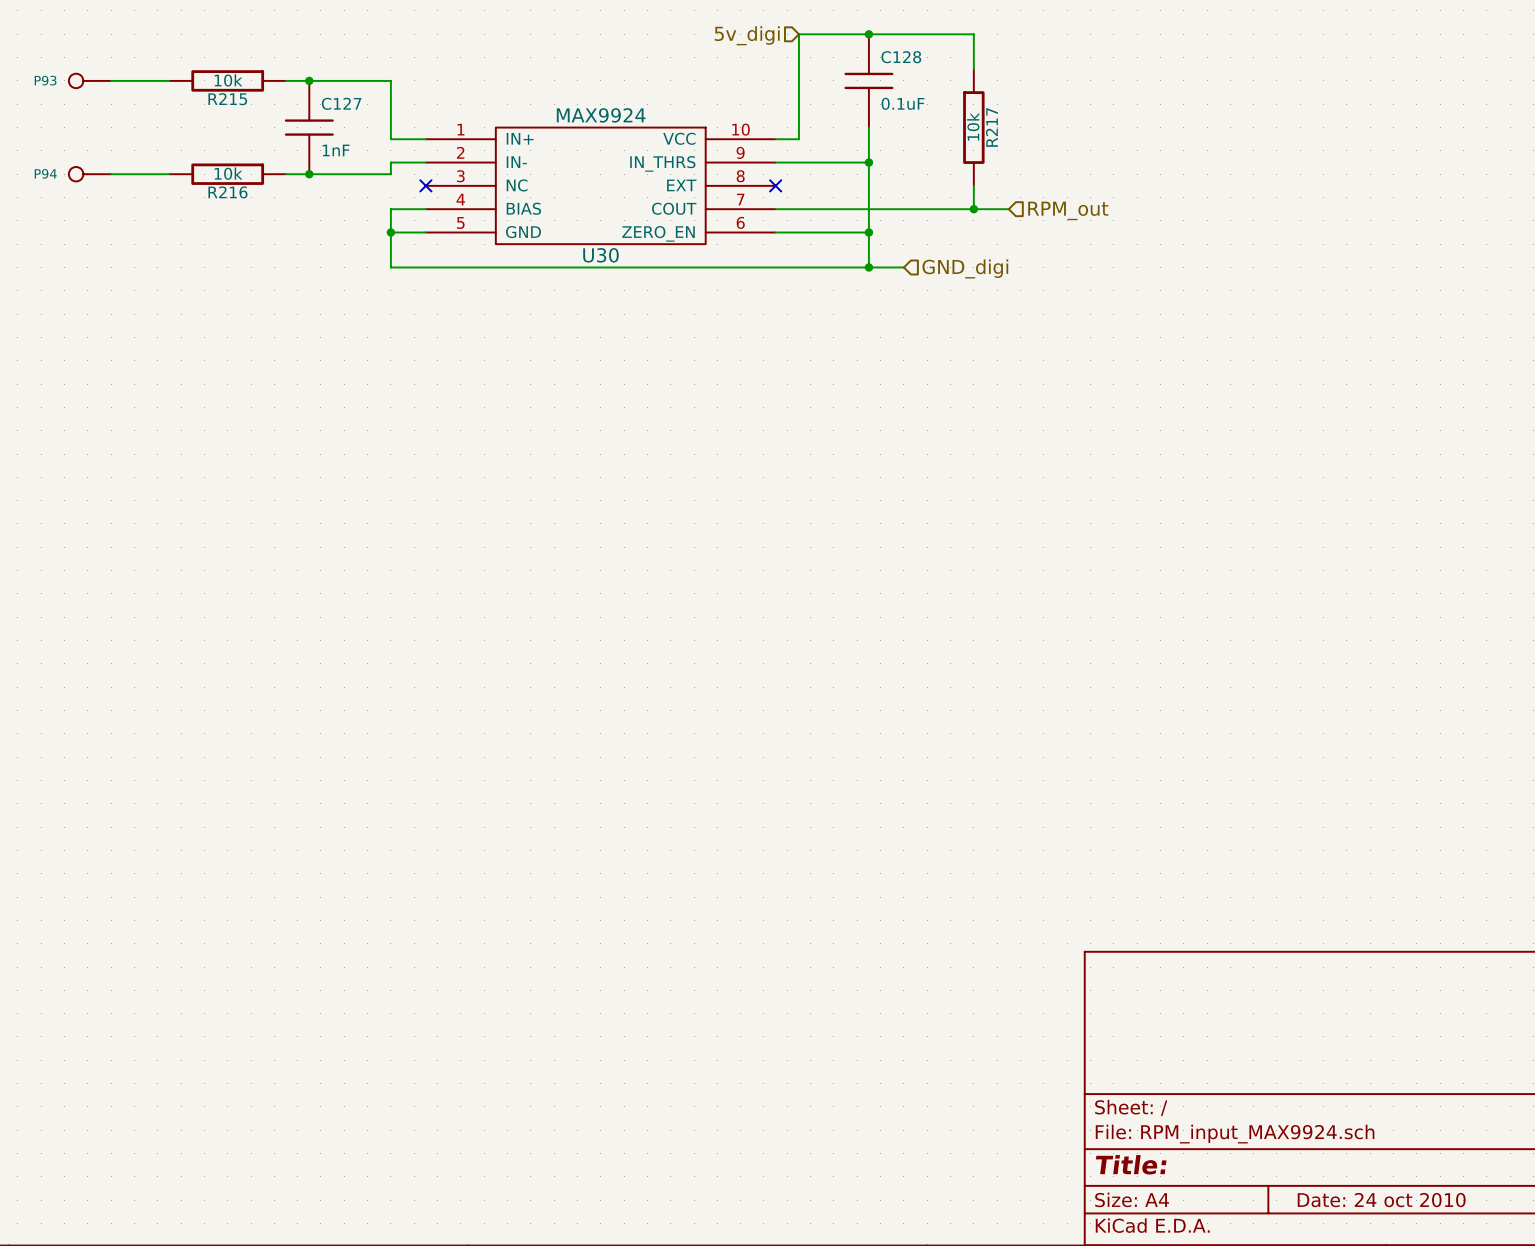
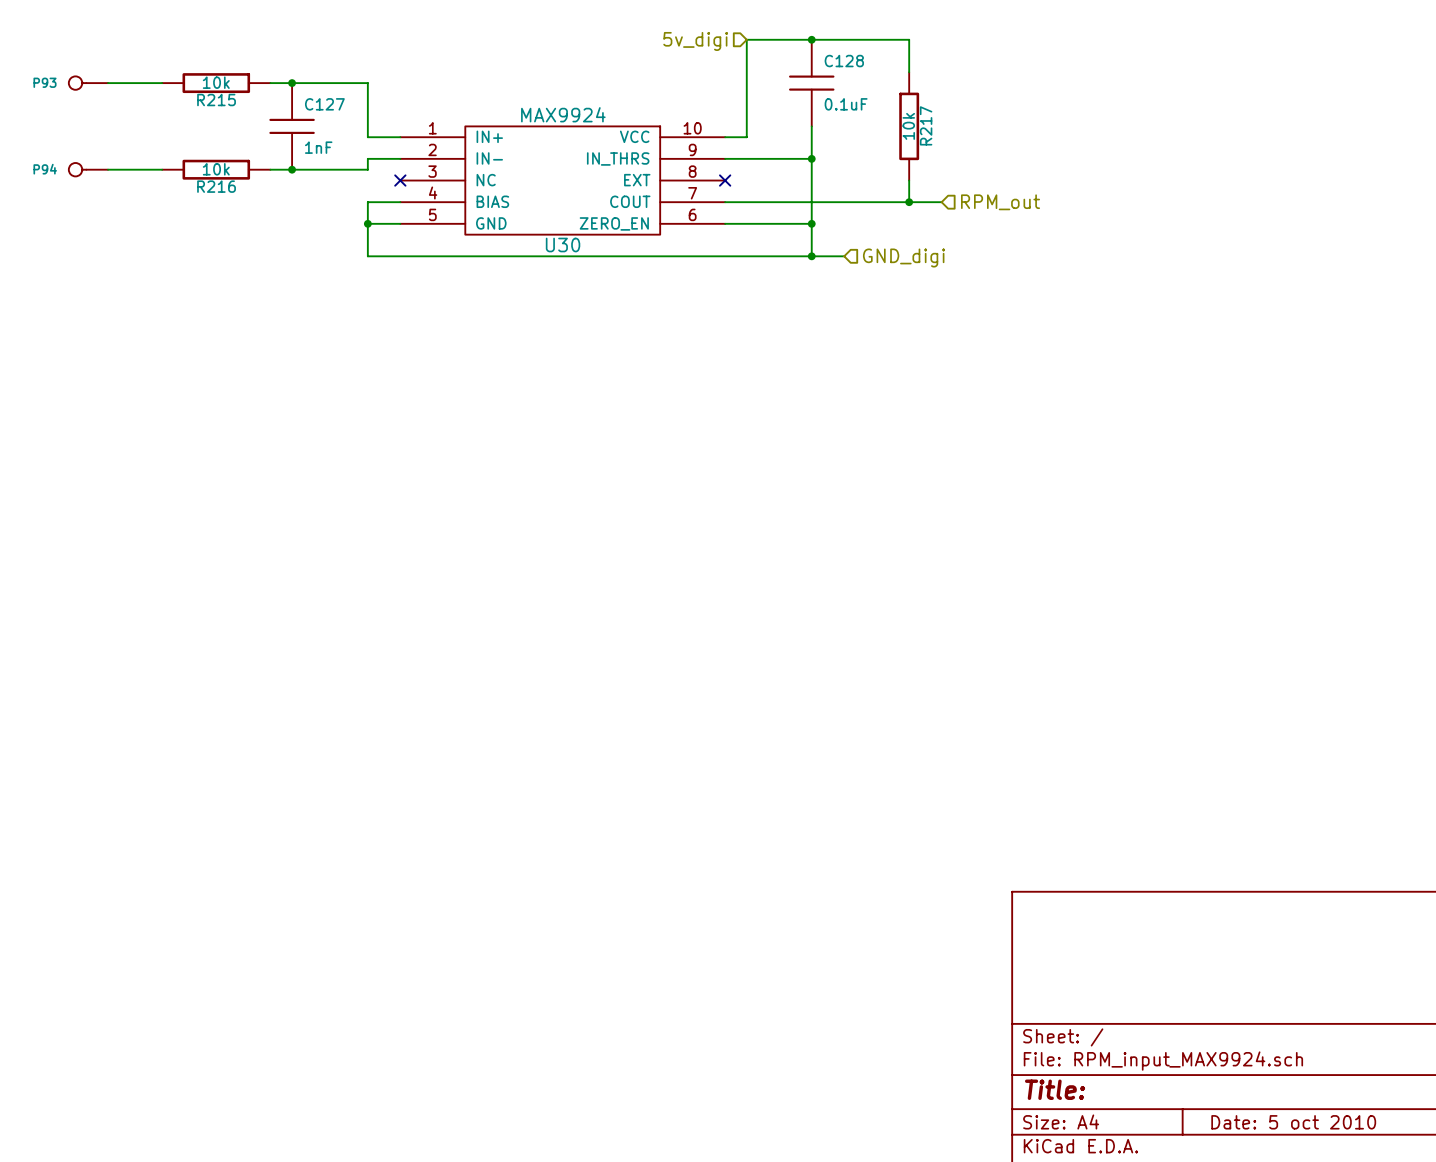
title block: Date: 24 oct 2010 (1381, 1200) -> Date: 5 oct 2010 (1293, 1122)

